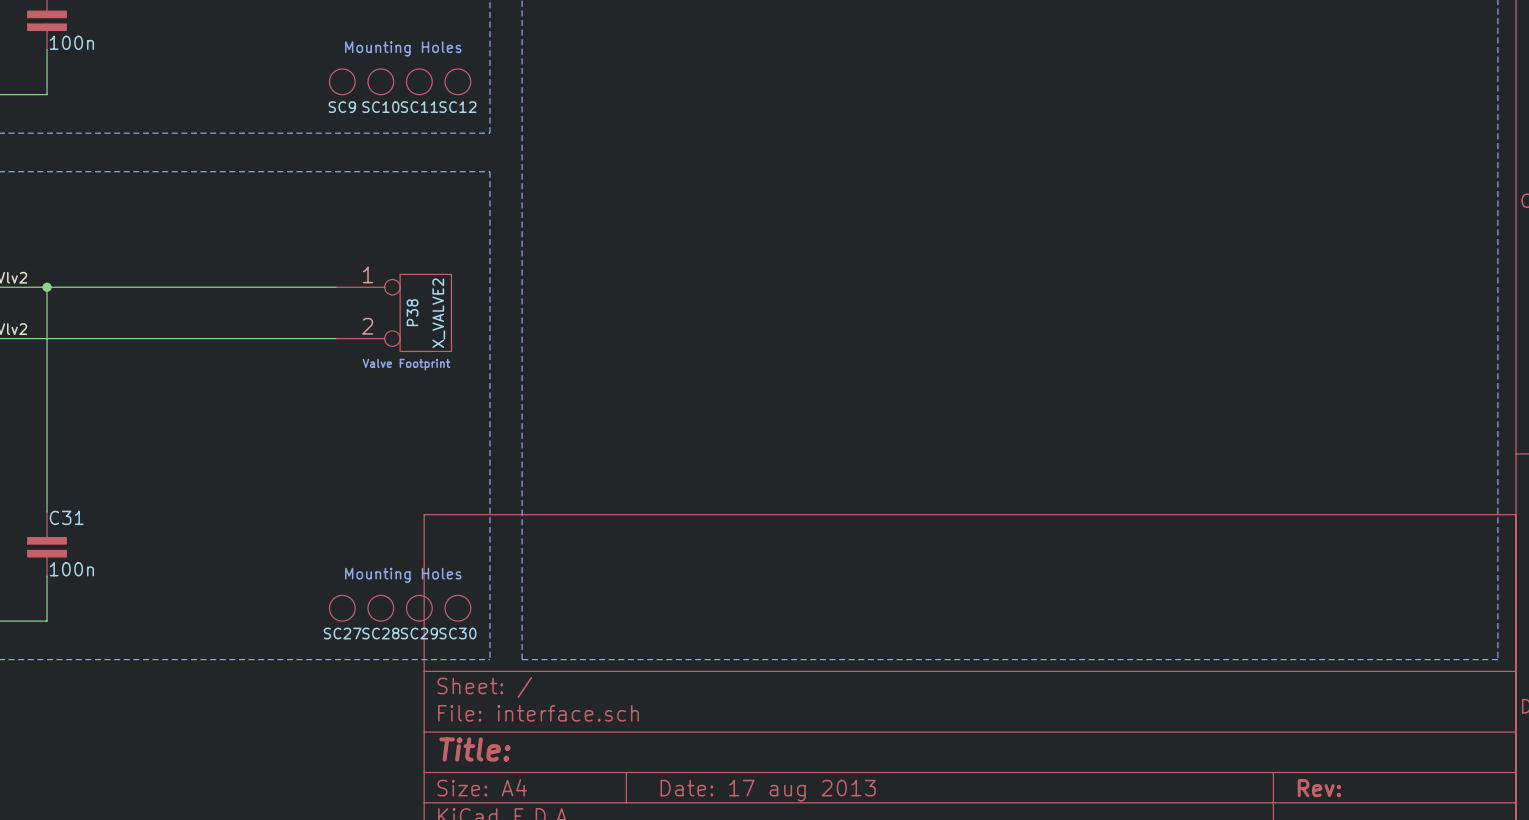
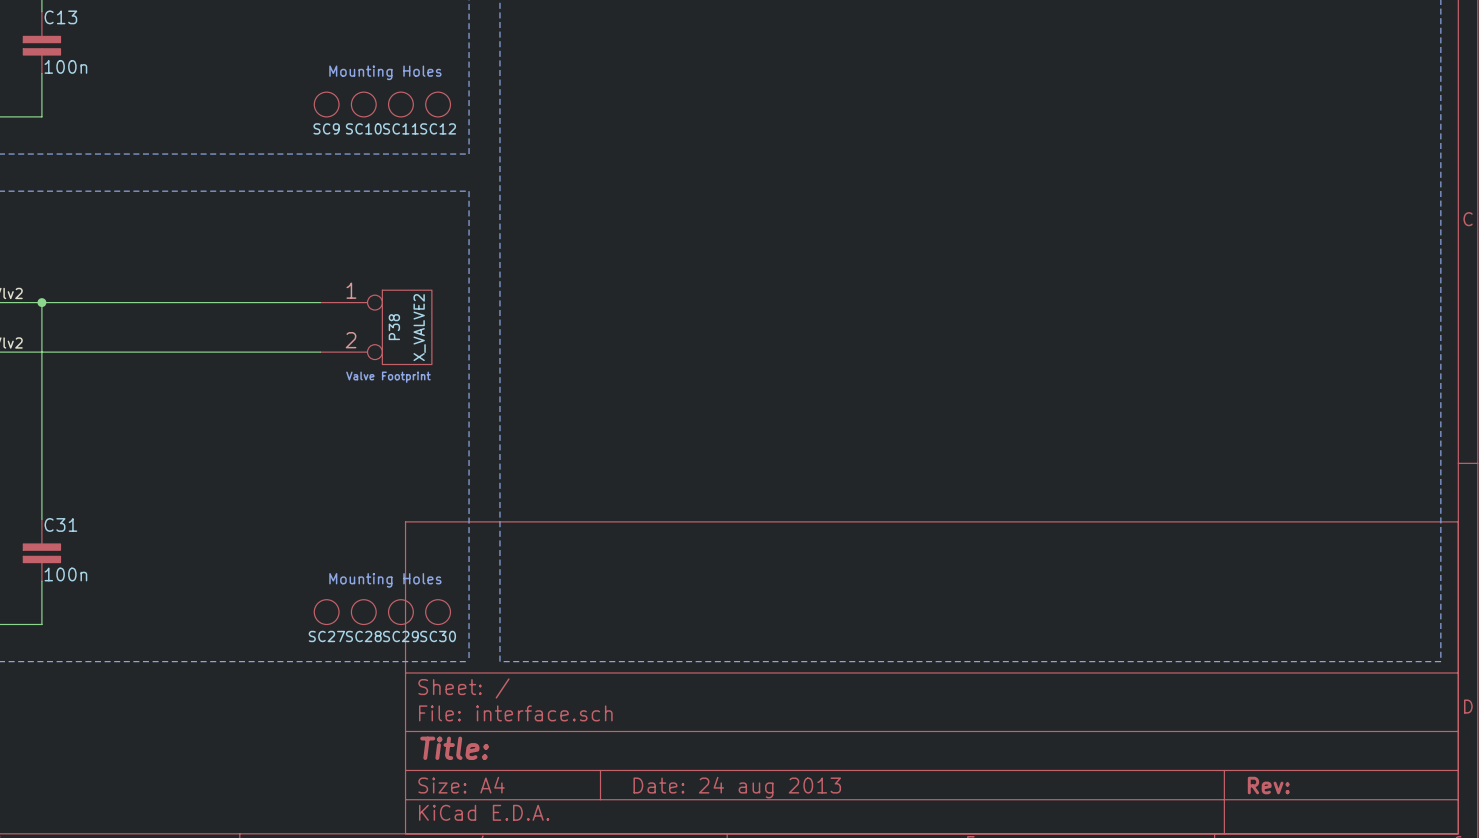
title block: Date: 17 aug 2013 (768, 790) -> Date: 24 aug 2013 (737, 787)

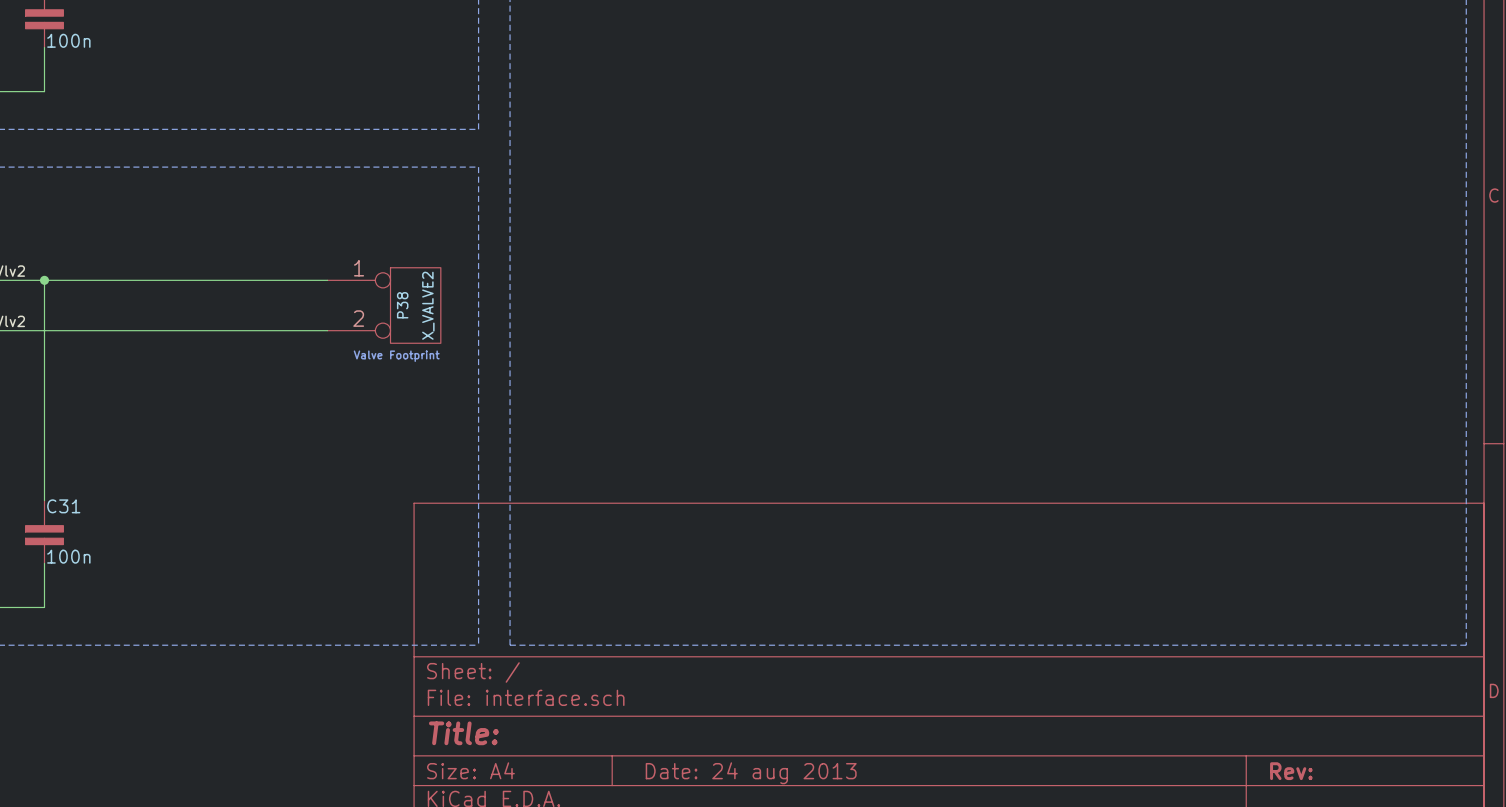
text: Mounting Holes (385, 72) -> none
SC9: (326, 104) -> none
SC10: (363, 104) -> none
SC11: (400, 104) -> none
SC12: (438, 104) -> none
text: Mounting Holes (385, 580) -> none
SC27: (326, 612) -> none
SC28: (363, 612) -> none
SC29: (400, 612) -> none
SC30: (438, 612) -> none

